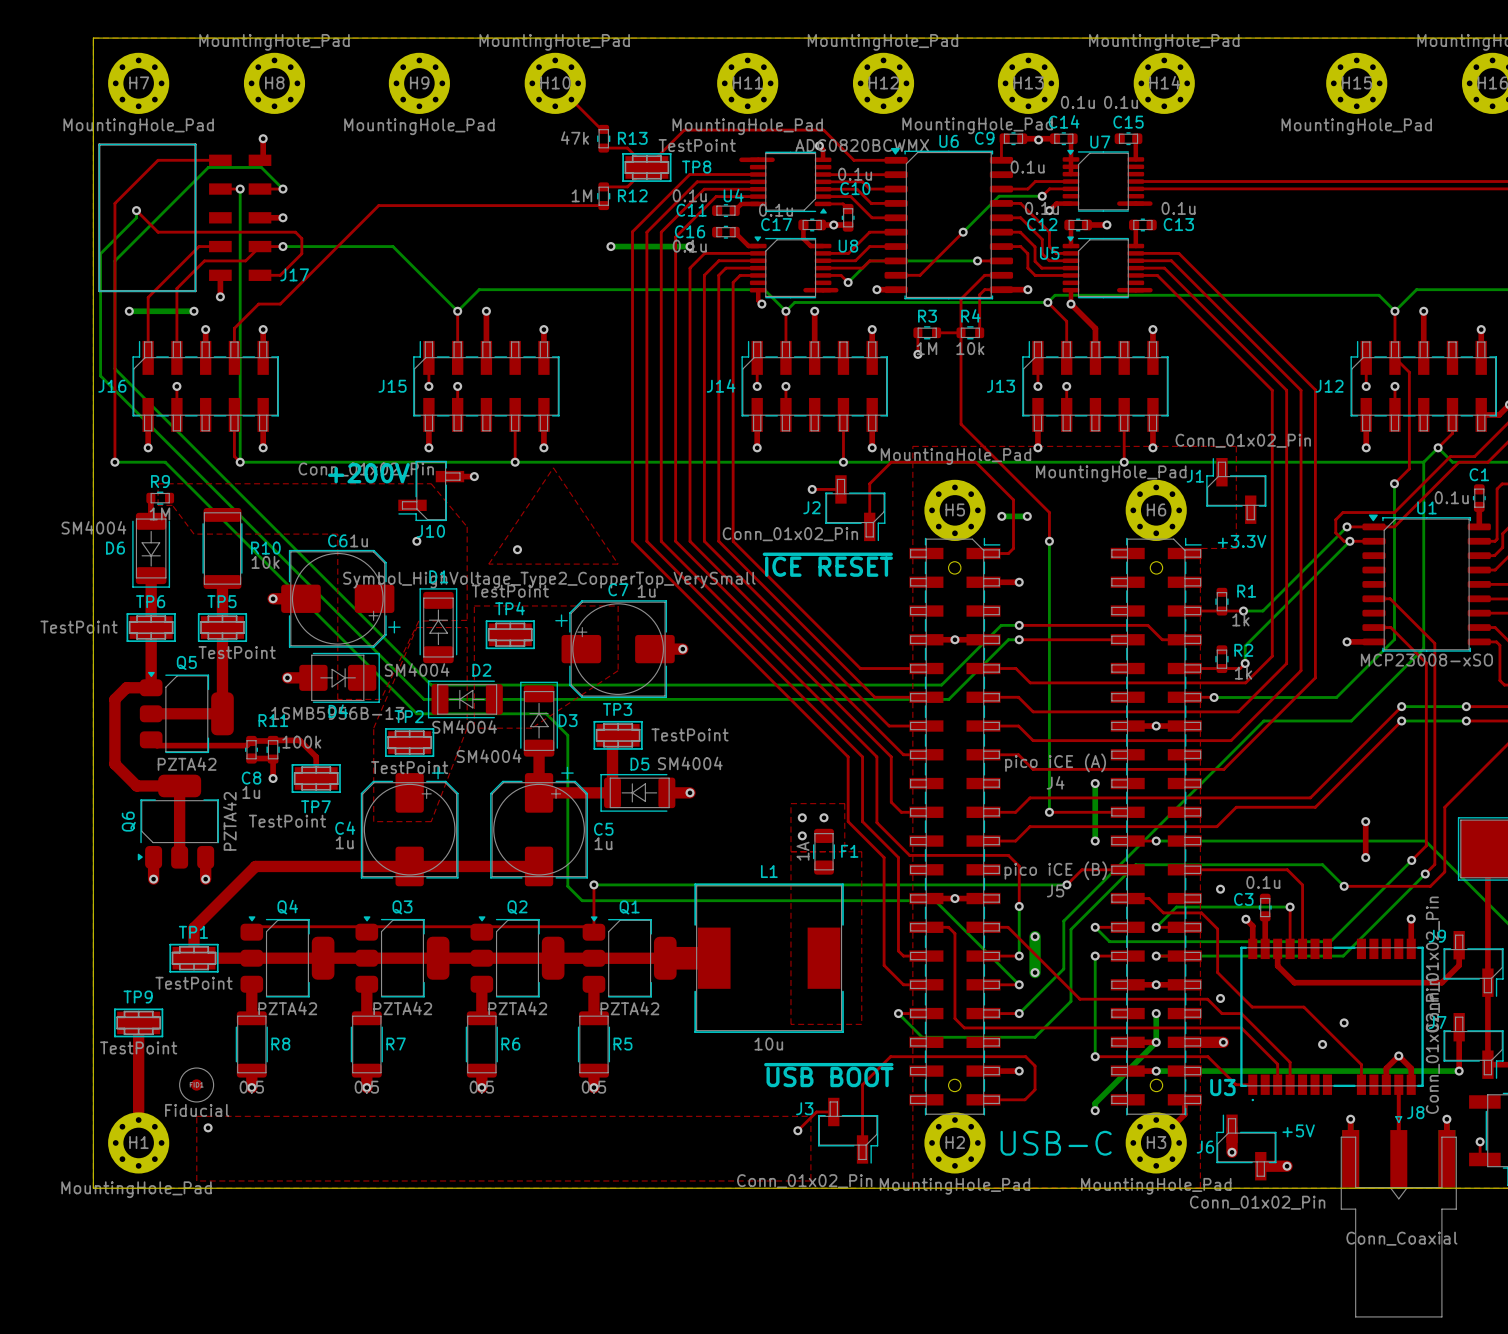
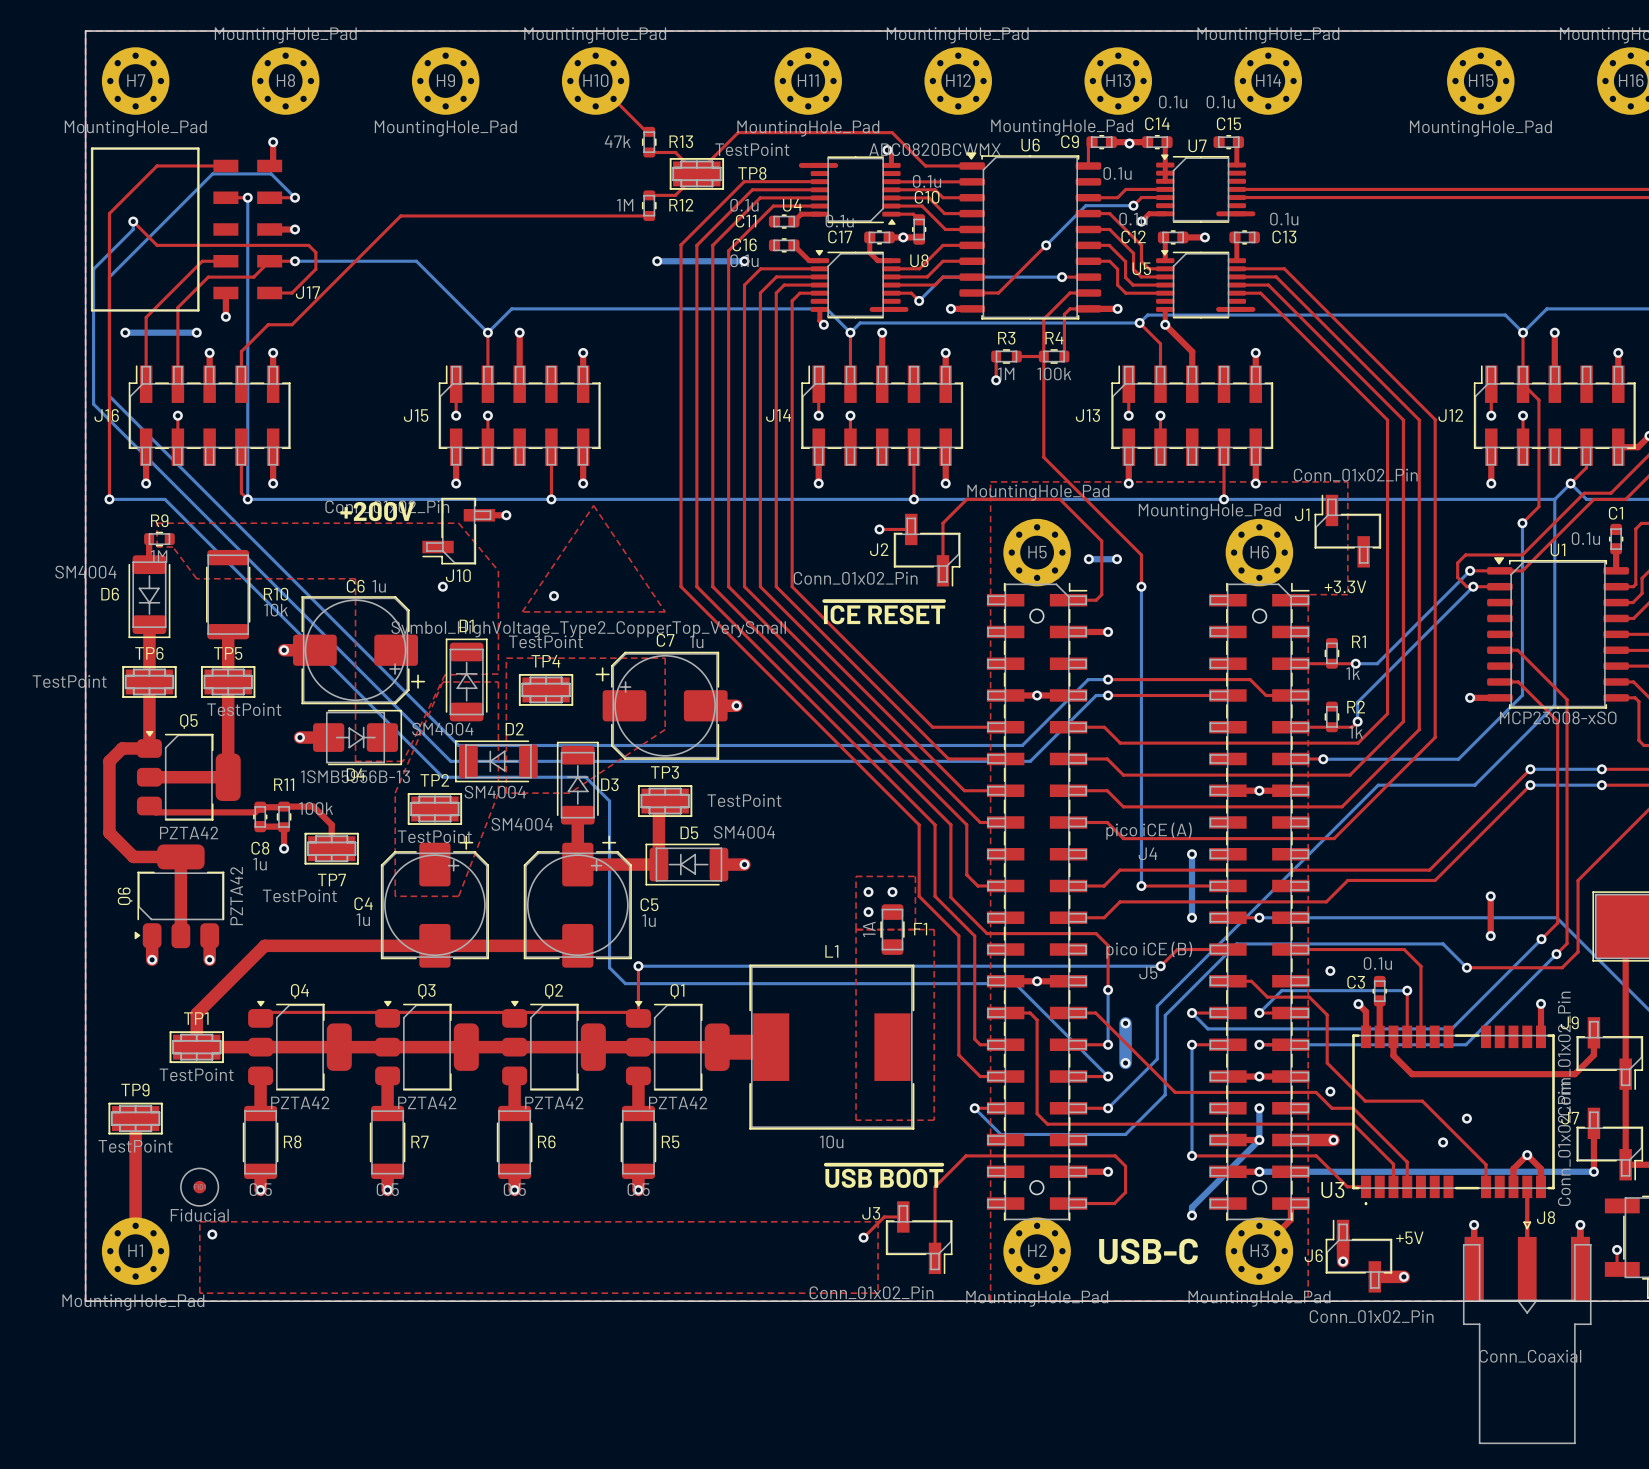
R4 value: 10k (970, 348) -> 100k (1054, 373)

